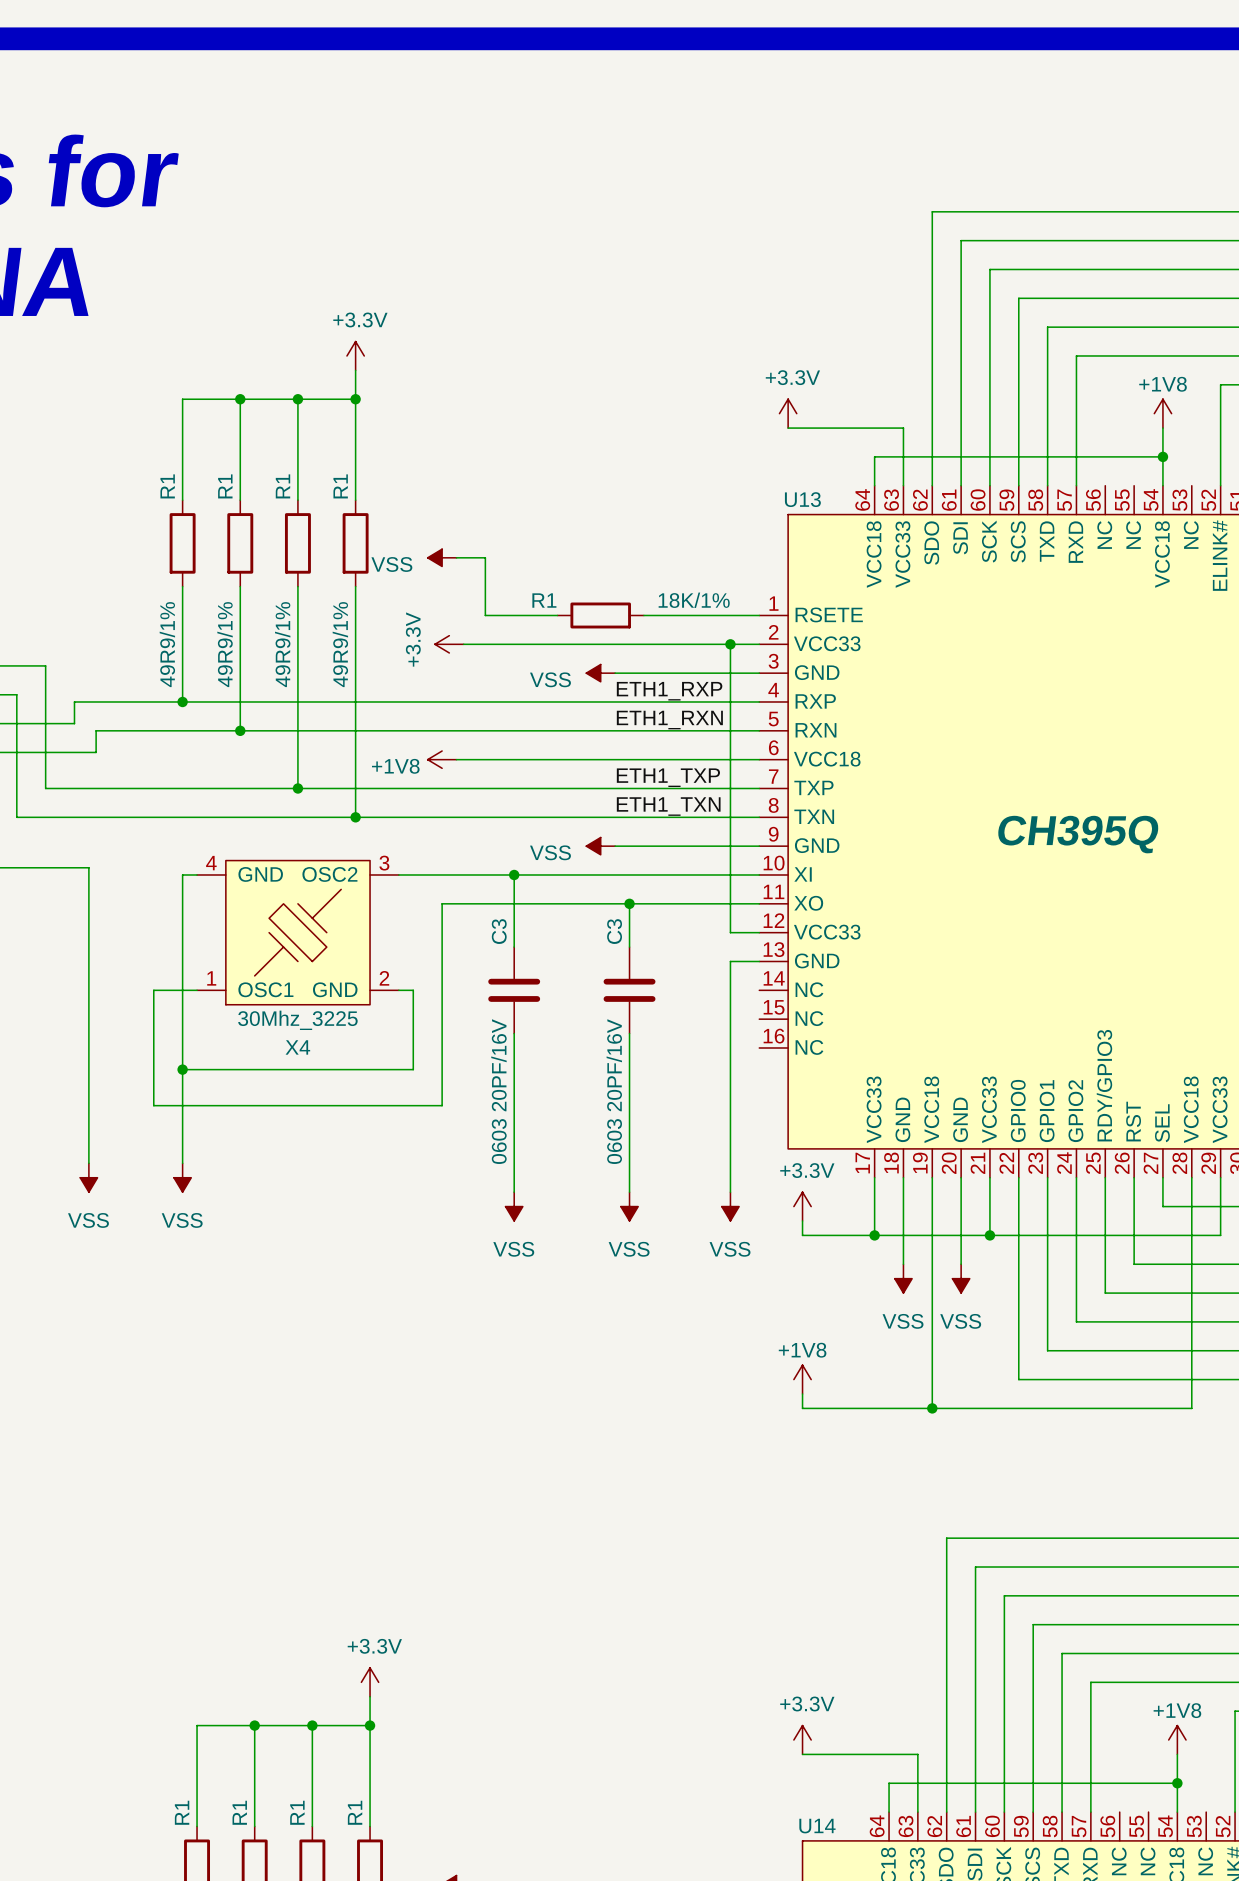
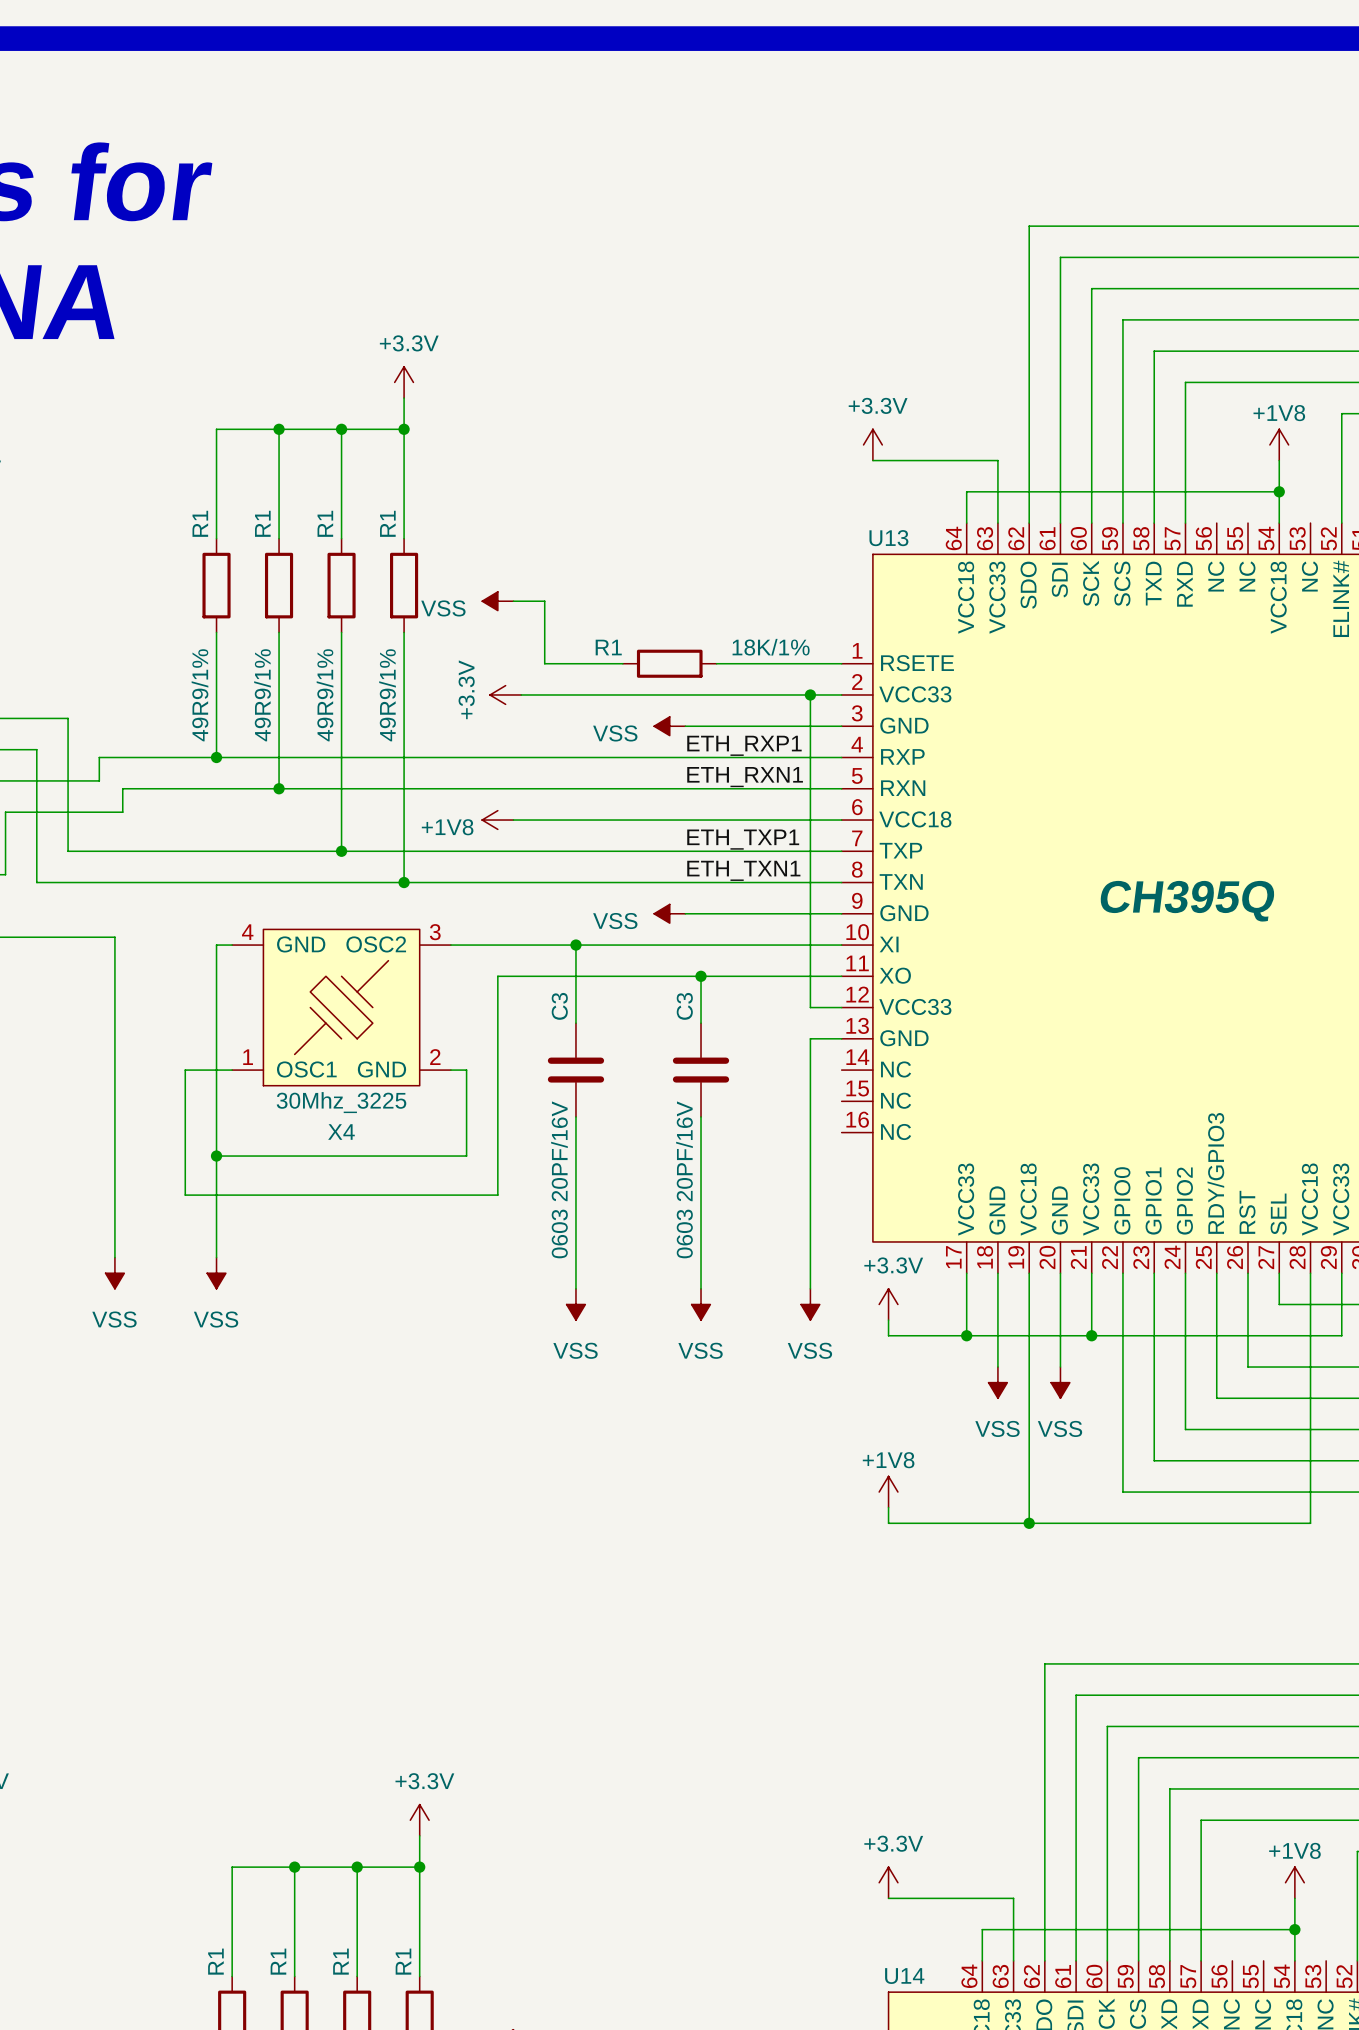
label: ETH1_RXP (669, 691) -> ETH_RXP1 (744, 745)
label: ETH1_RXN (669, 720) -> ETH_RXN1 (745, 777)
label: ETH1_TXP (668, 777) -> ETH_TXP1 (743, 839)
label: ETH1_TXN (668, 806) -> ETH_TXN1 (743, 870)

